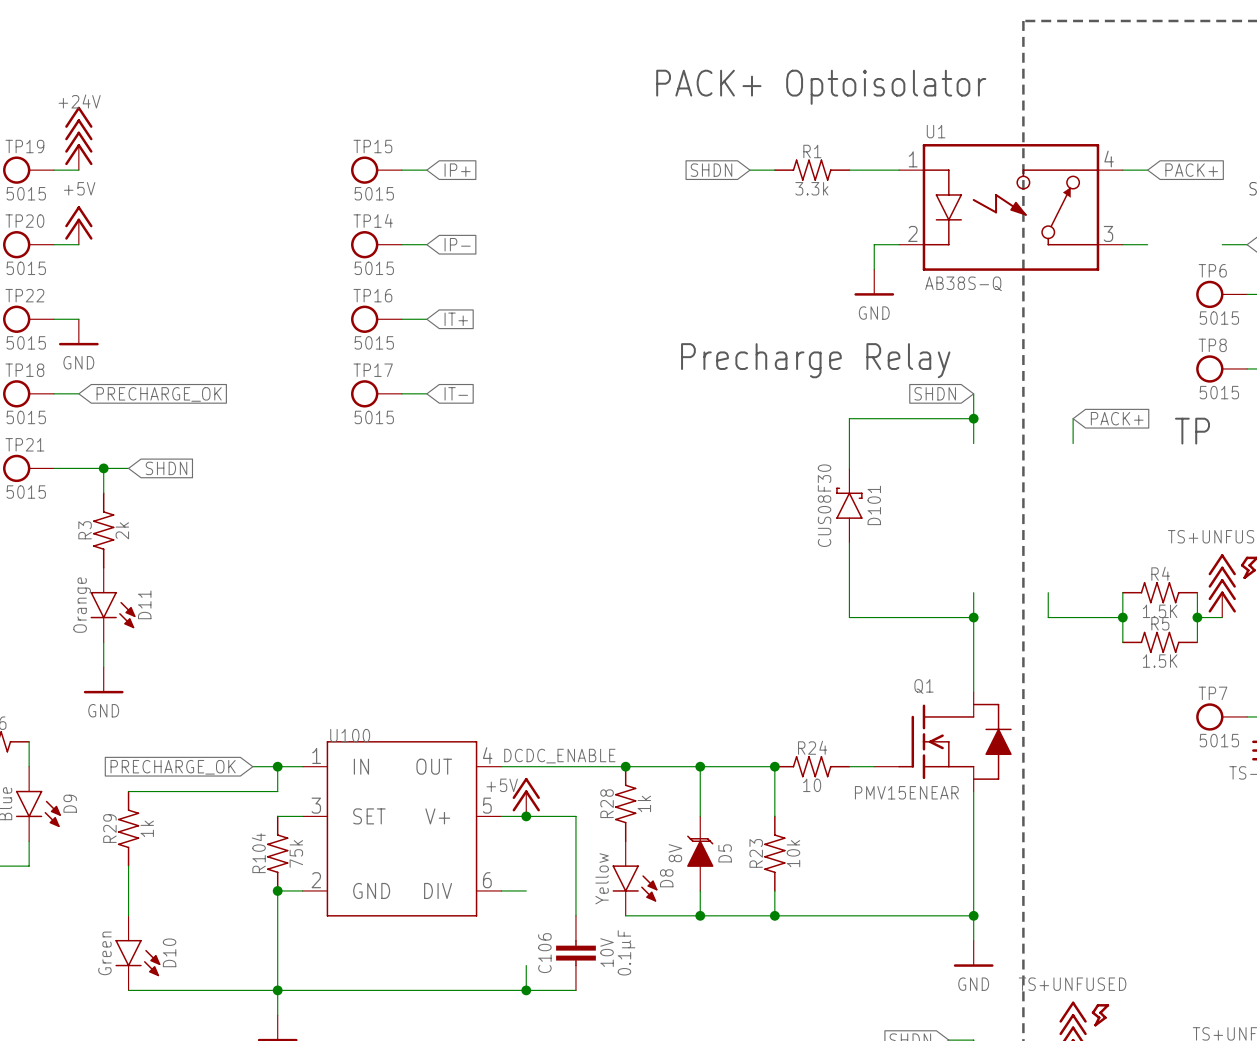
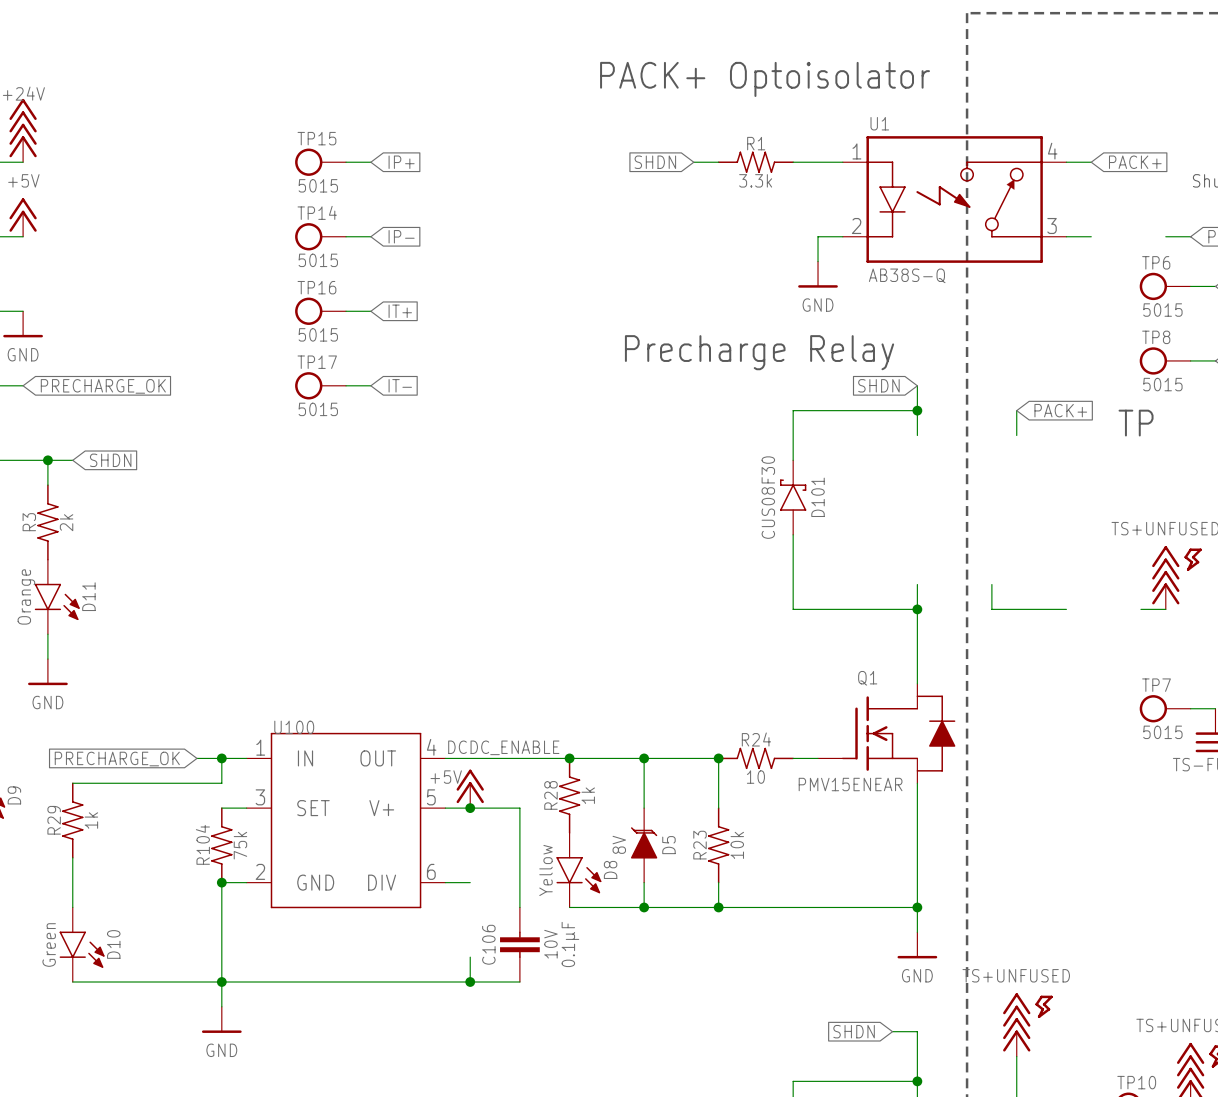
wire: (1122, 592) (1122, 642) -> none
R4: (1160, 592) -> none
wire: (1197, 592) (1197, 642) -> none
junction: (1122, 617) -> none
junction: (1197, 617) -> none
R5: (1160, 642) -> none

